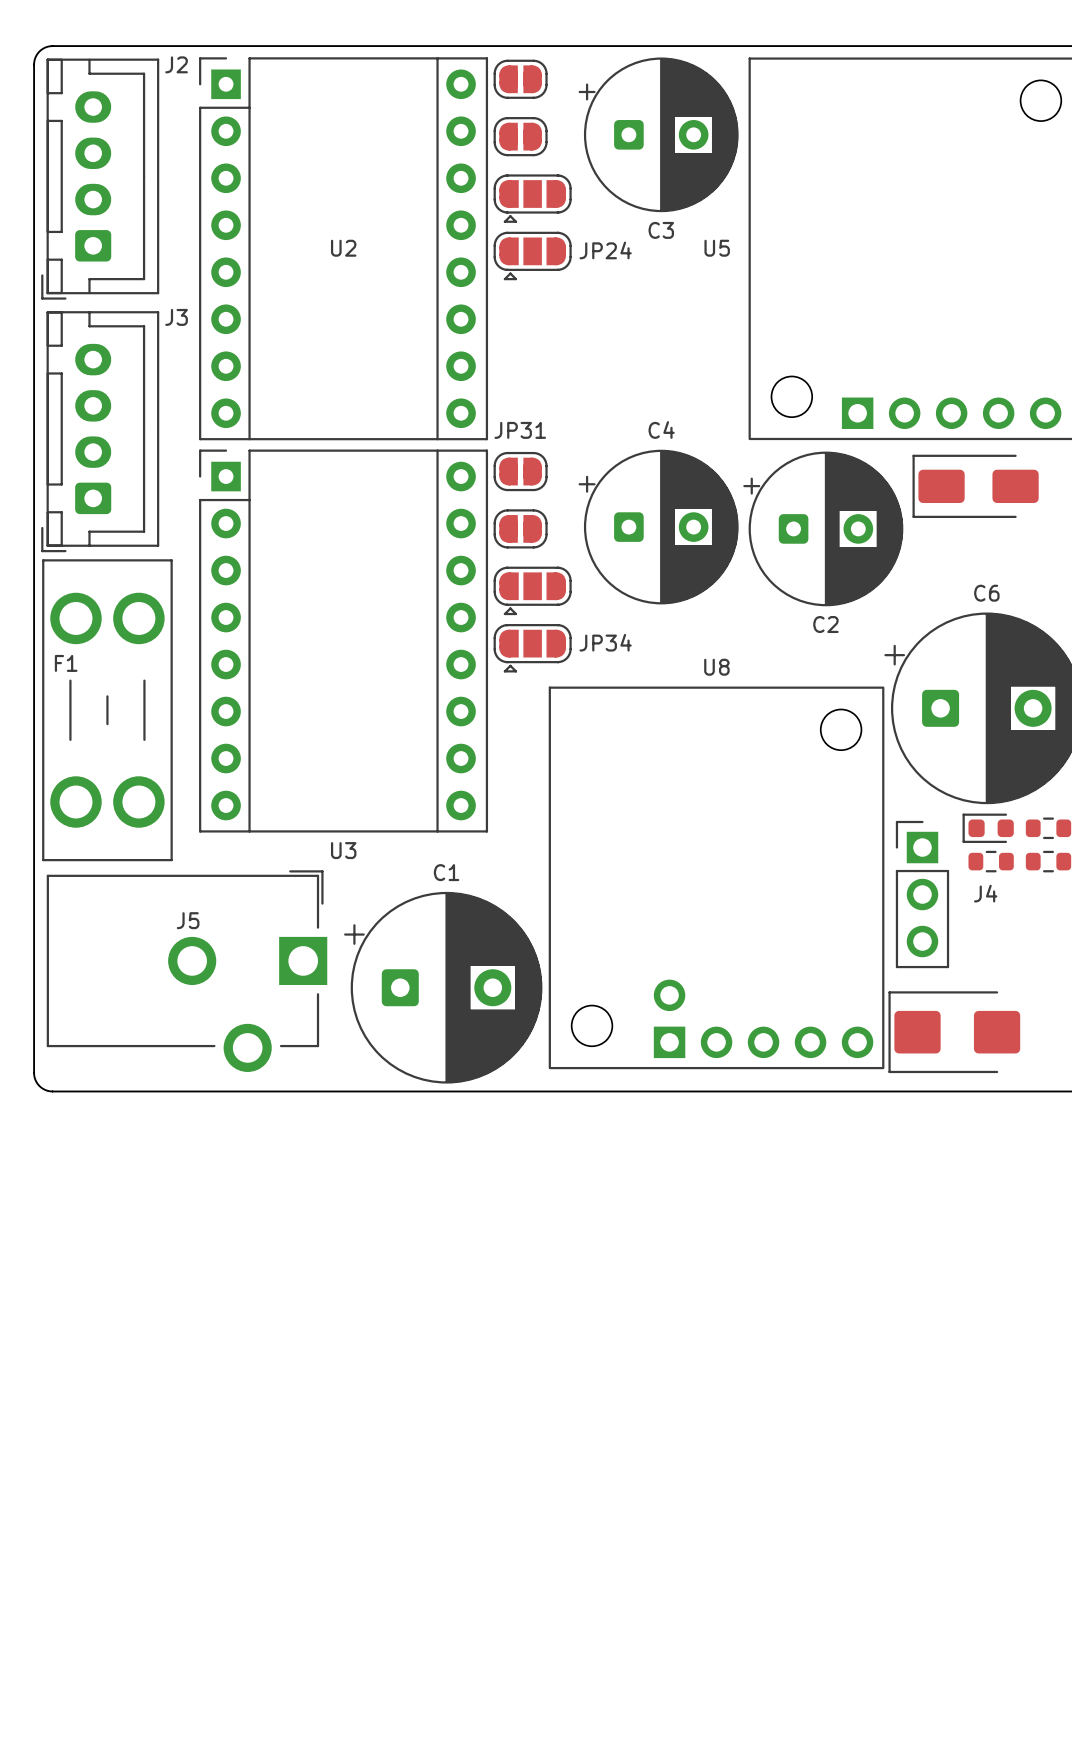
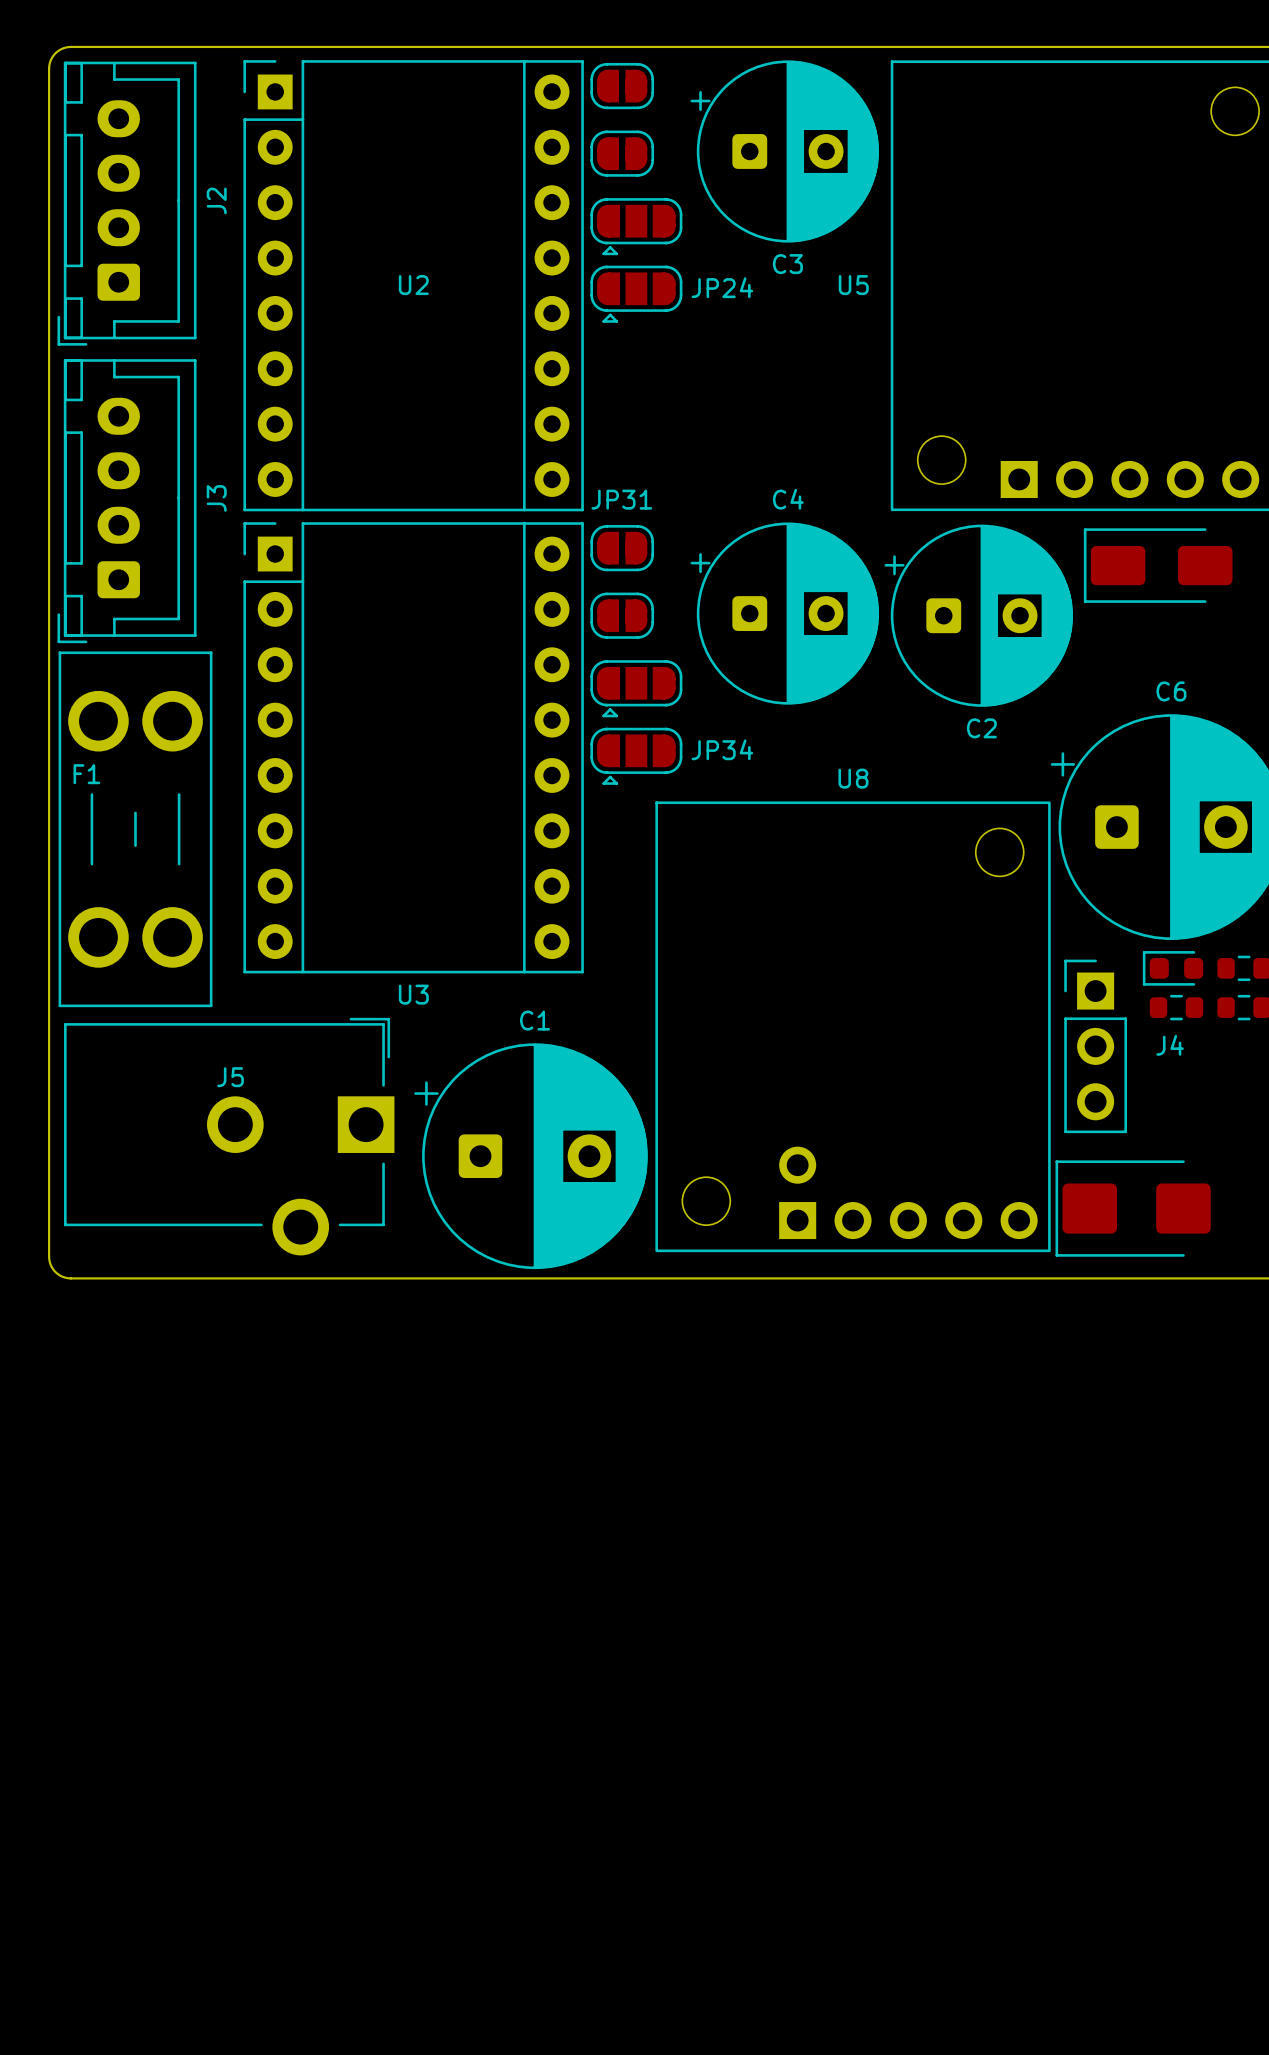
J2 name rotation: 0° (176, 64) -> 90° counterclockwise (216, 200)
J2 name position: J2 (176, 64) -> J2 (216, 200)
J3 name rotation: 0° (176, 317) -> 90° counterclockwise (216, 498)
J3 name position: J3 (176, 317) -> J3 (216, 498)

